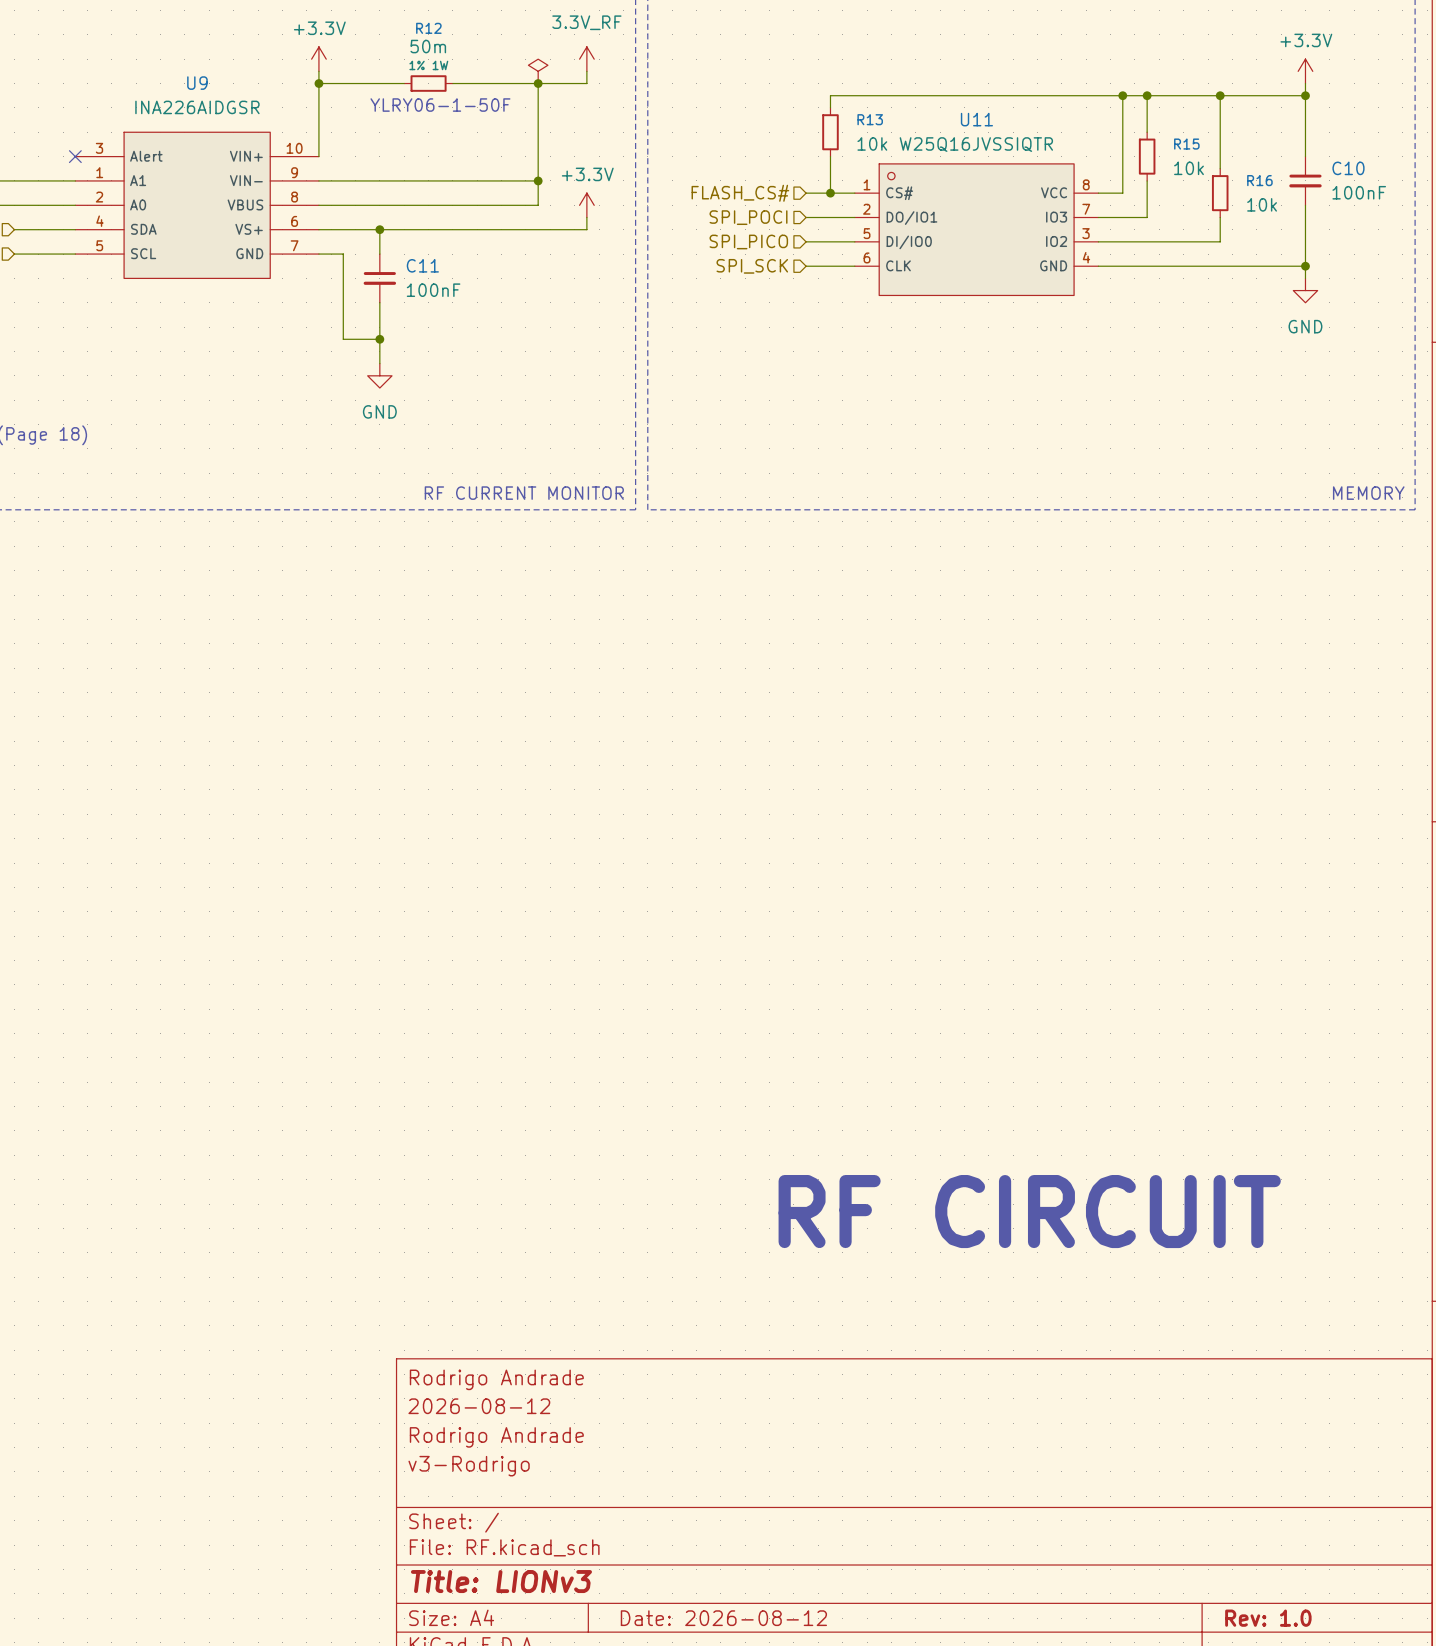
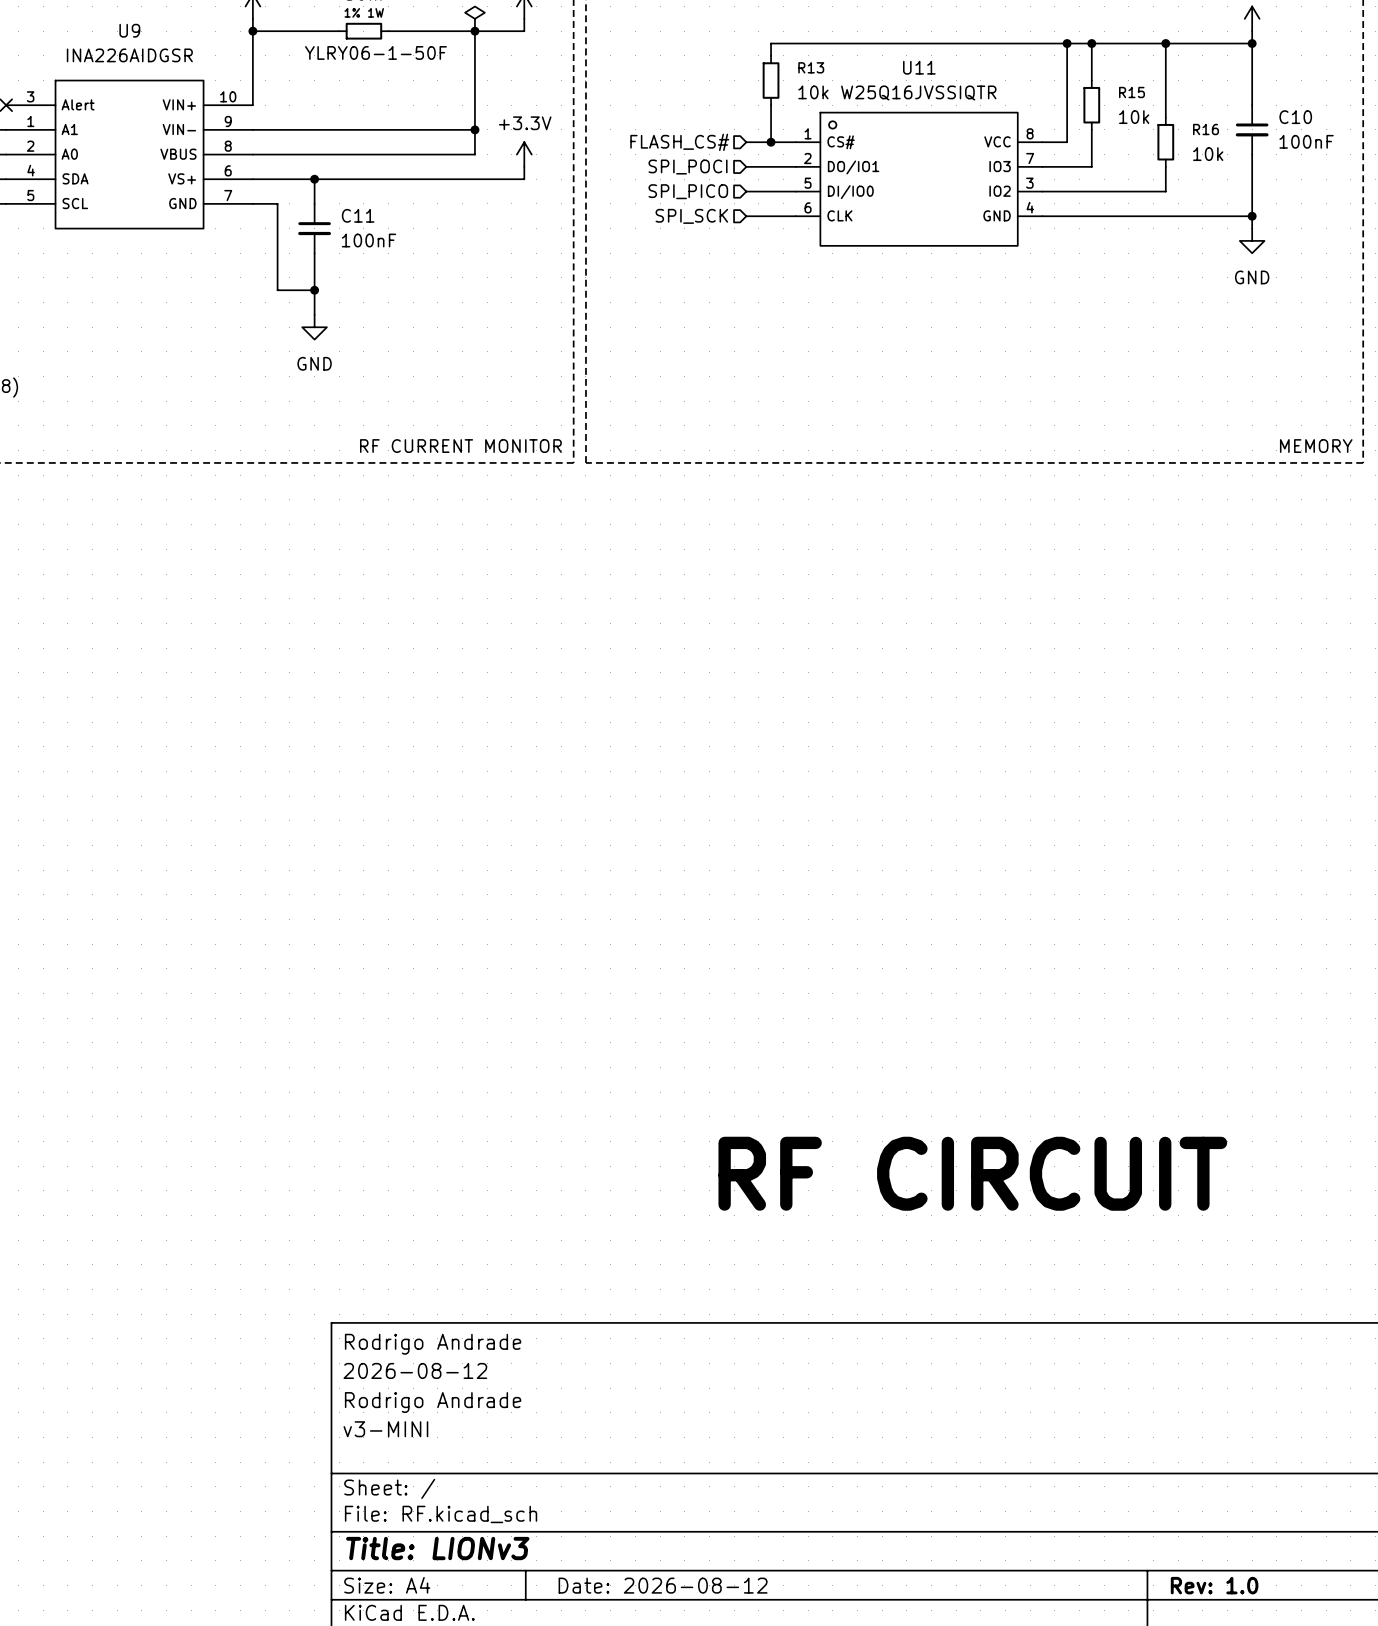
title block: v3-Rodrigo (469, 1466) -> v3-MINI (385, 1429)

